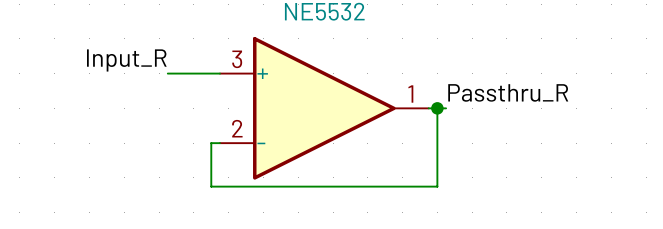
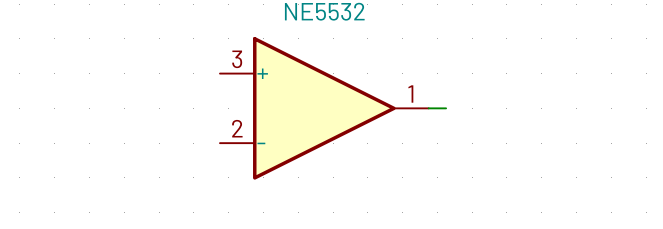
label: Input_R (126, 60) -> none
wire: (167, 73) (219, 73) -> none
label: Passthru_R (508, 92) -> none
wire: (437, 108) (437, 186) (211, 186) (211, 143) (219, 143) -> none
junction: (437, 108) -> none

